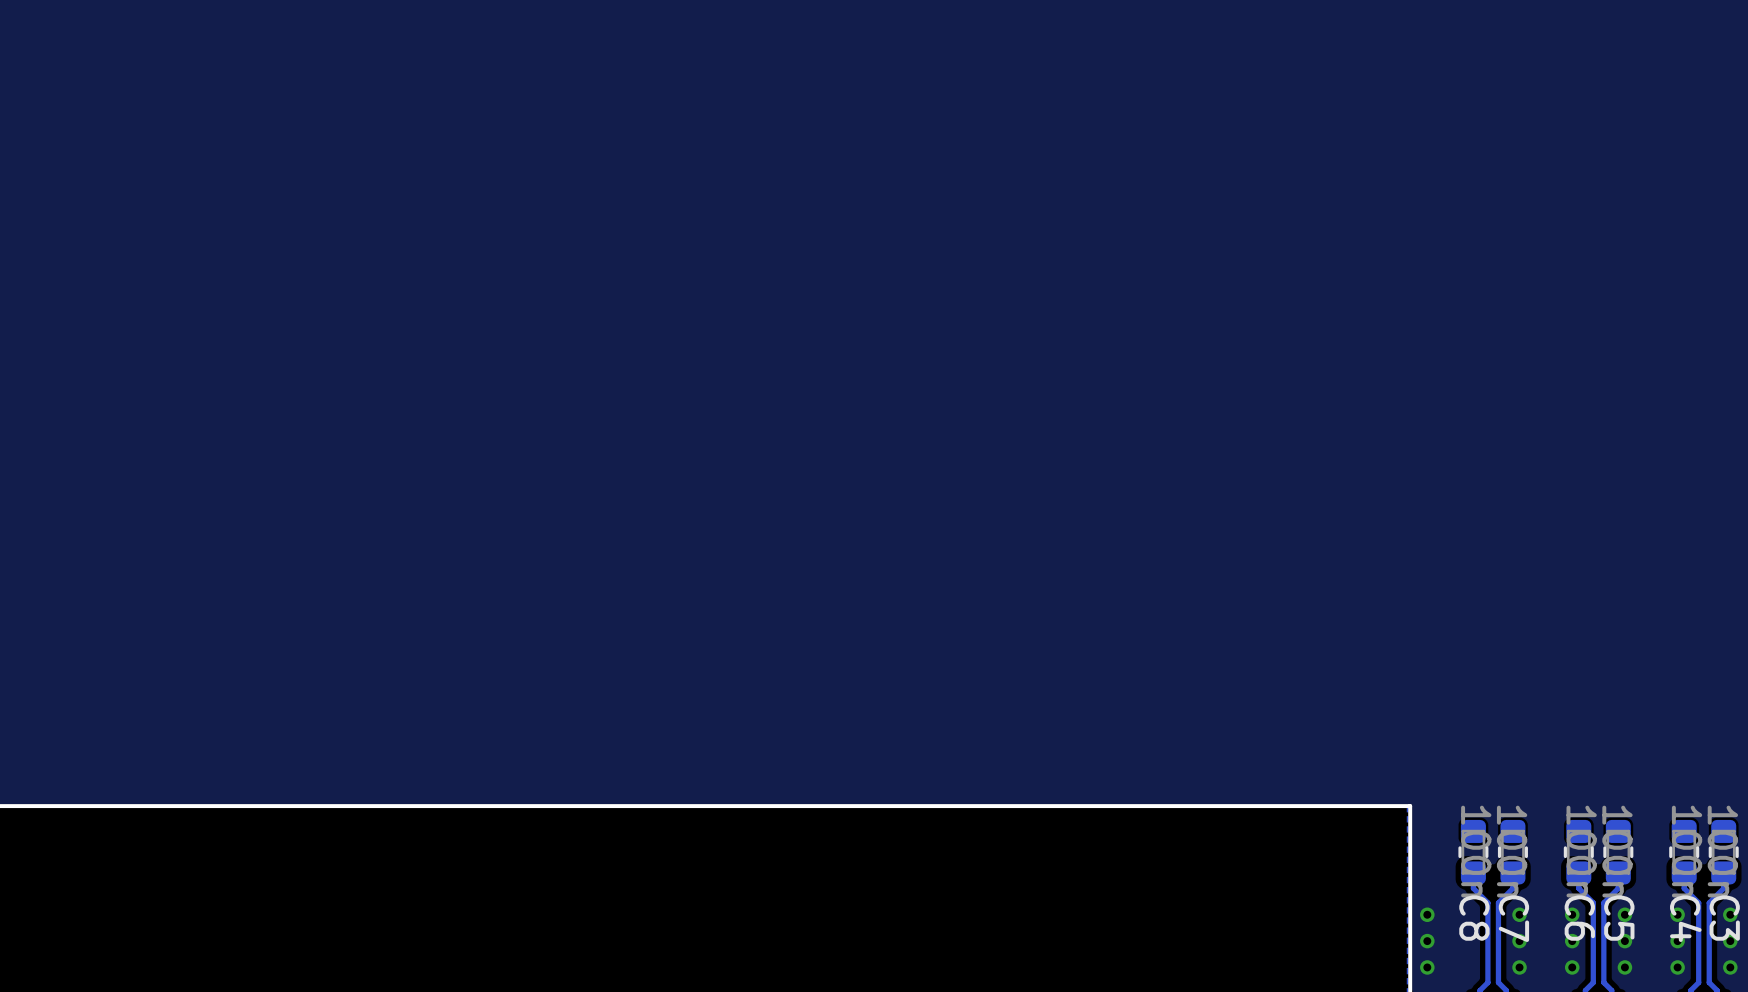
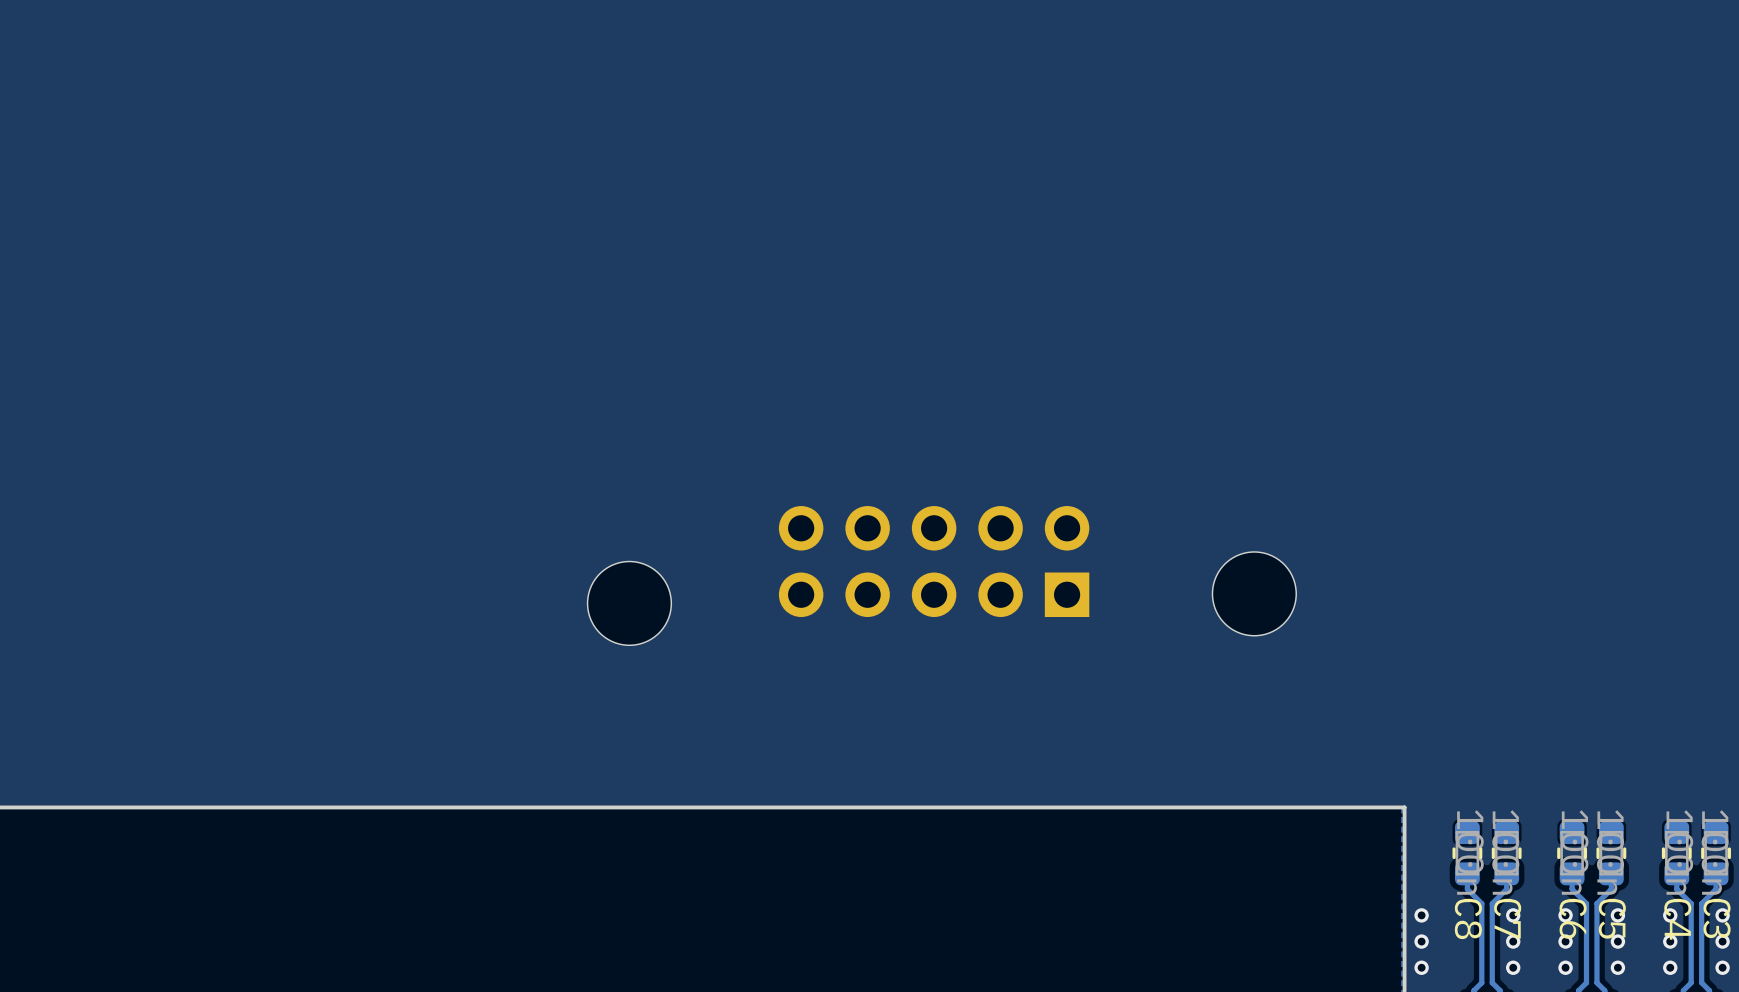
part: none -> (934, 561)
part: none -> (1254, 593)
part: none -> (629, 603)

